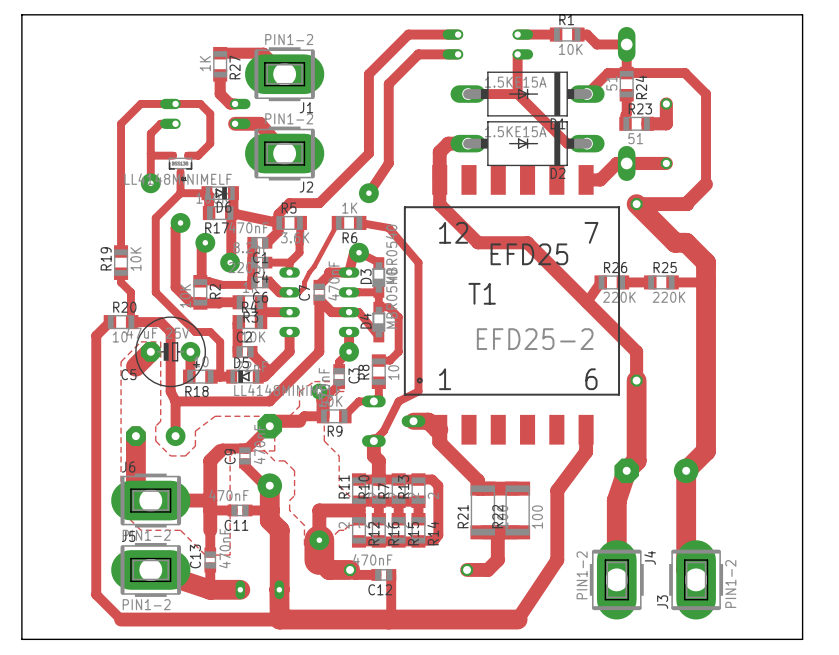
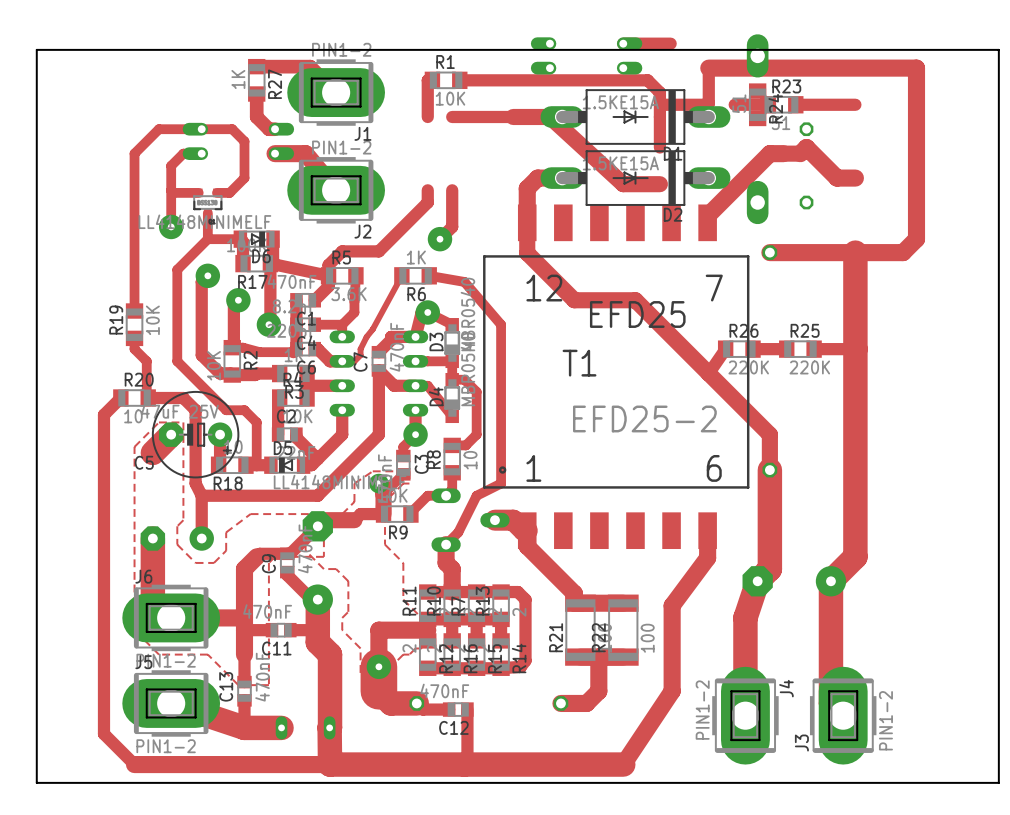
board edge: (21, 14) (802, 14) (802, 639) (21, 639) (21, 14) -> (36, 49) (36, 782) (998, 782) (998, 49) (36, 49)
track: (458, 34) (408, 34) (368, 74) (368, 153) (359, 163) -> (427, 190) (427, 202)
R1 position: (567, 34) -> (446, 80)
track: (578, 34) (587, 34) (596, 44) (626, 44) (626, 73) -> none
track: (458, 54) (418, 54) (388, 84) (388, 163) (368, 193) -> (452, 190) (452, 226) (439, 239)
track: (517, 54) (517, 94) -> none
track: none -> (432, 80) (427, 80) (427, 116)
track: none -> (459, 80) (647, 80) (659, 92) (659, 147)
track: none -> (734, 104) (768, 104)
track: none -> (795, 104) (855, 104)
track: none -> (452, 116) (549, 116) (623, 184) (659, 184)
track: (468, 94) (517, 94) -> none
track: (517, 94) (567, 143) (587, 143) -> none
track: (585, 95) (608, 73) (685, 73) (706, 94) (706, 184) (687, 204) -> (659, 104) (707, 104) (708, 68) (916, 68) (916, 239) (903, 252) (832, 252)
track: (626, 95) (625, 123) -> none
track: (666, 103) (666, 123) (661, 123) -> (855, 178) (837, 178) (806, 147) (800, 153)
R23 position: (636, 123) -> (782, 104)
track: (666, 163) (616, 163) (600, 179) (586, 179) -> (783, 153) (769, 153) (707, 215) (707, 222)
track: (636, 204) (675, 242) (686, 242) (706, 262) -> (855, 252) (855, 324)

